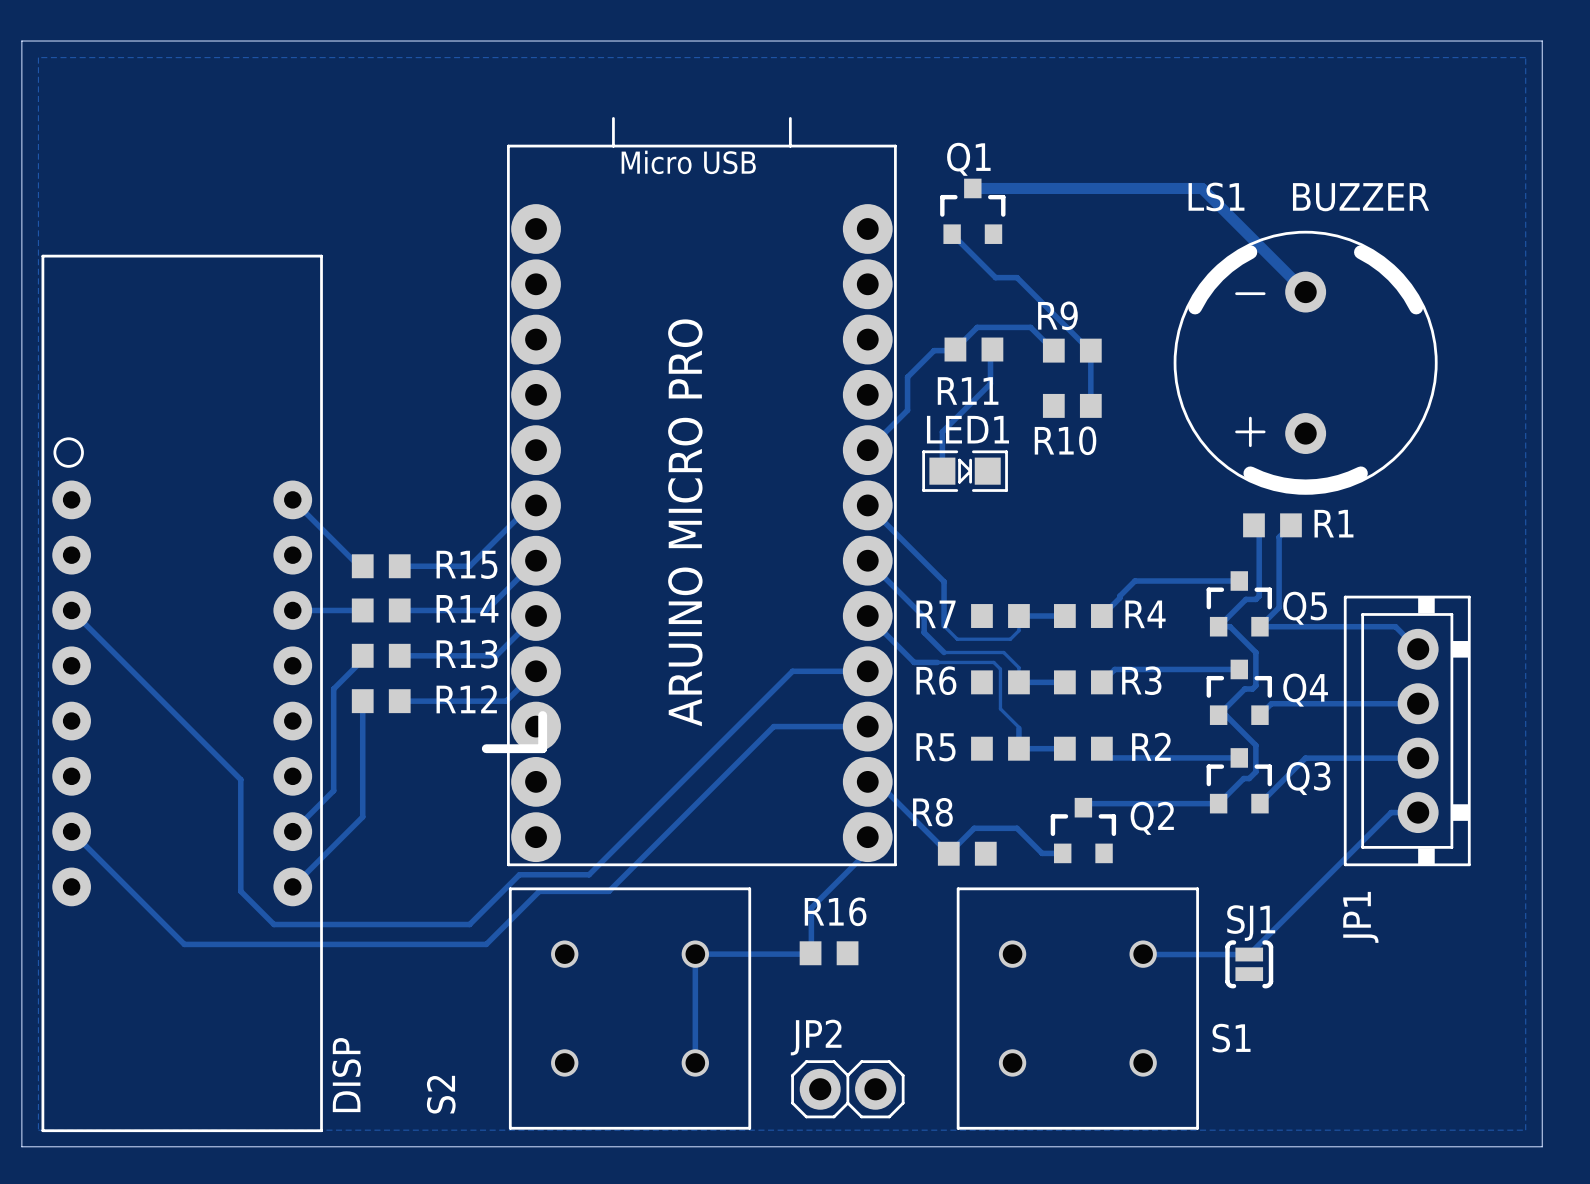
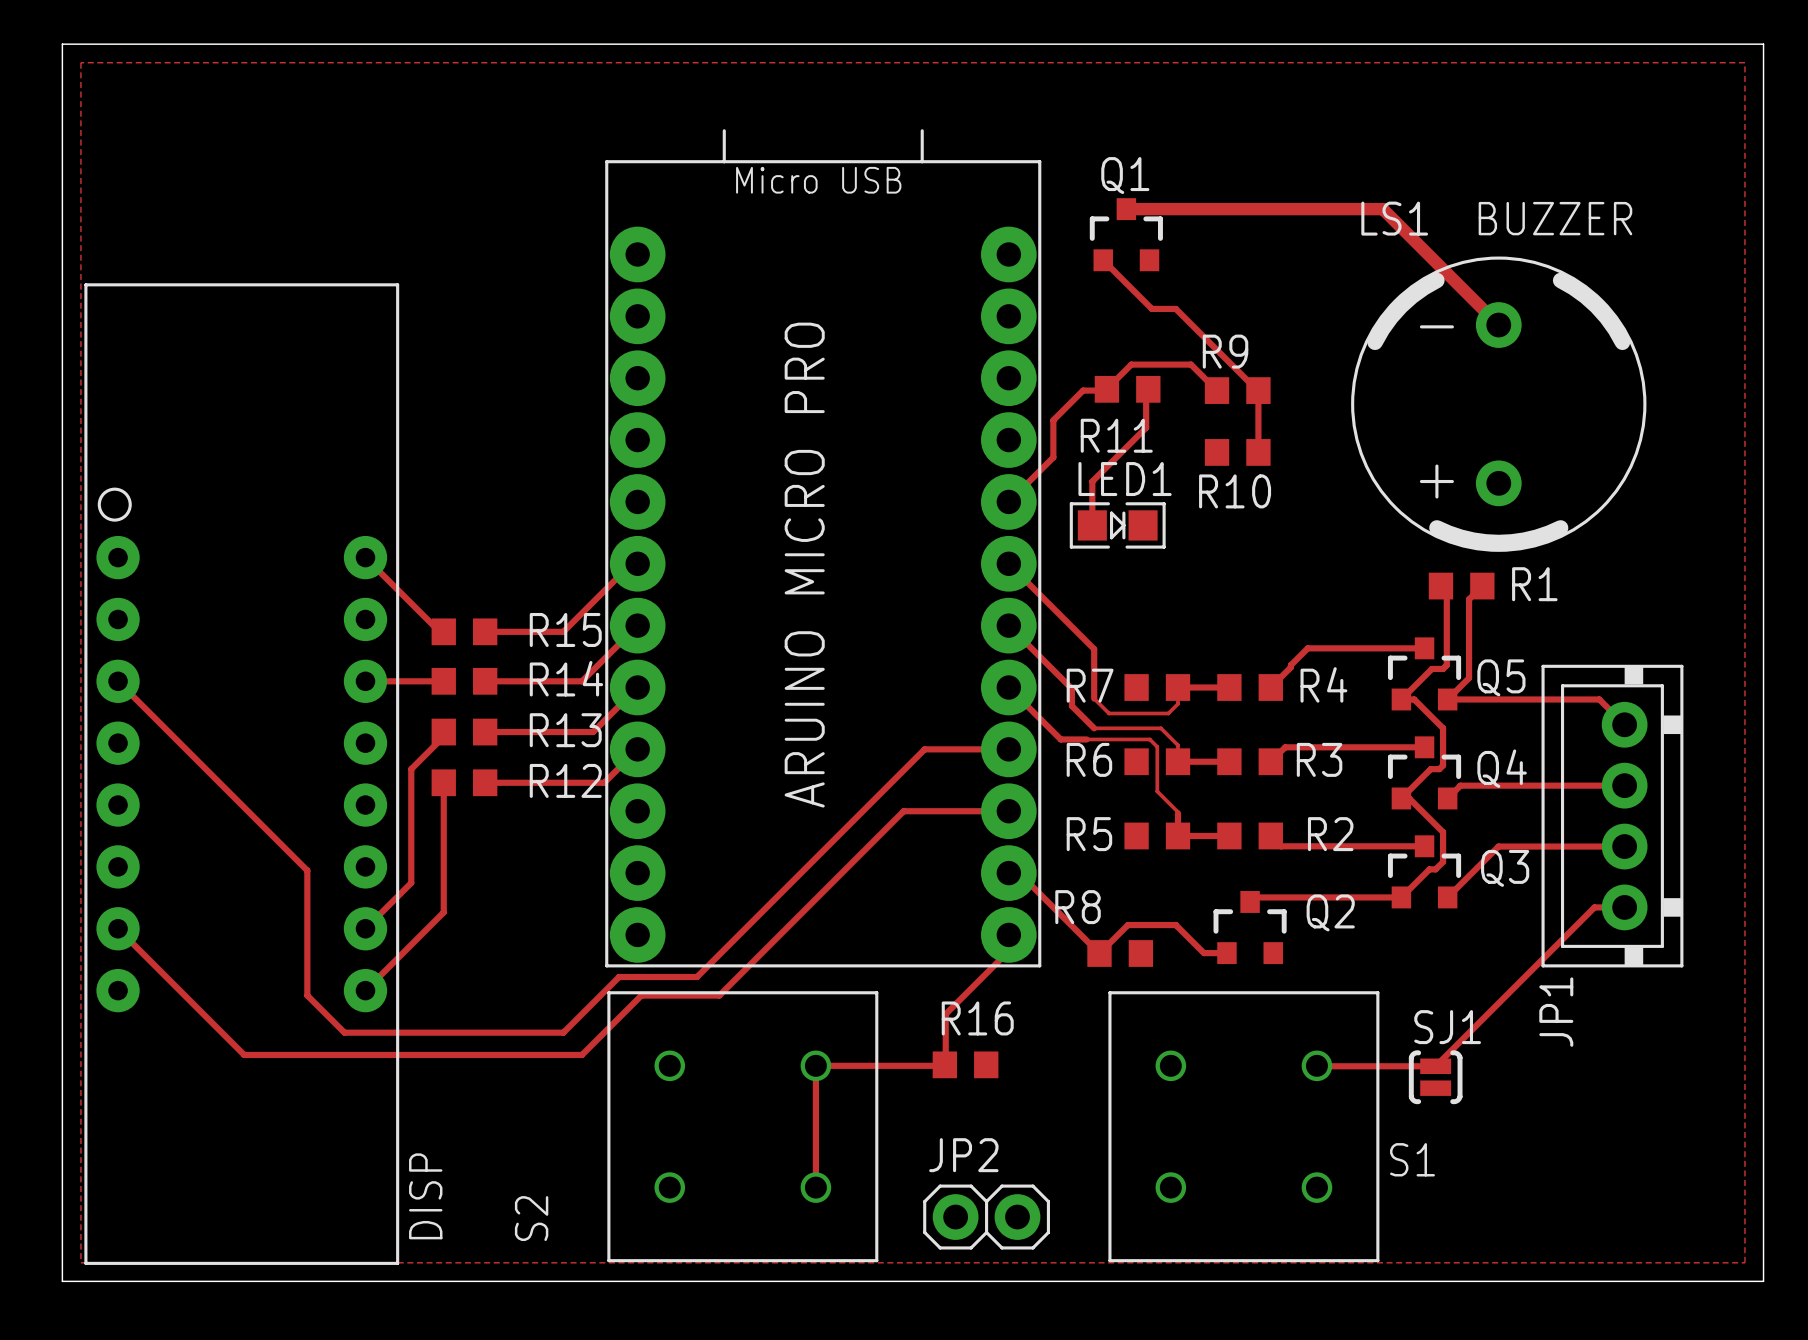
line: (542, 715) (542, 748) (486, 748) -> none

